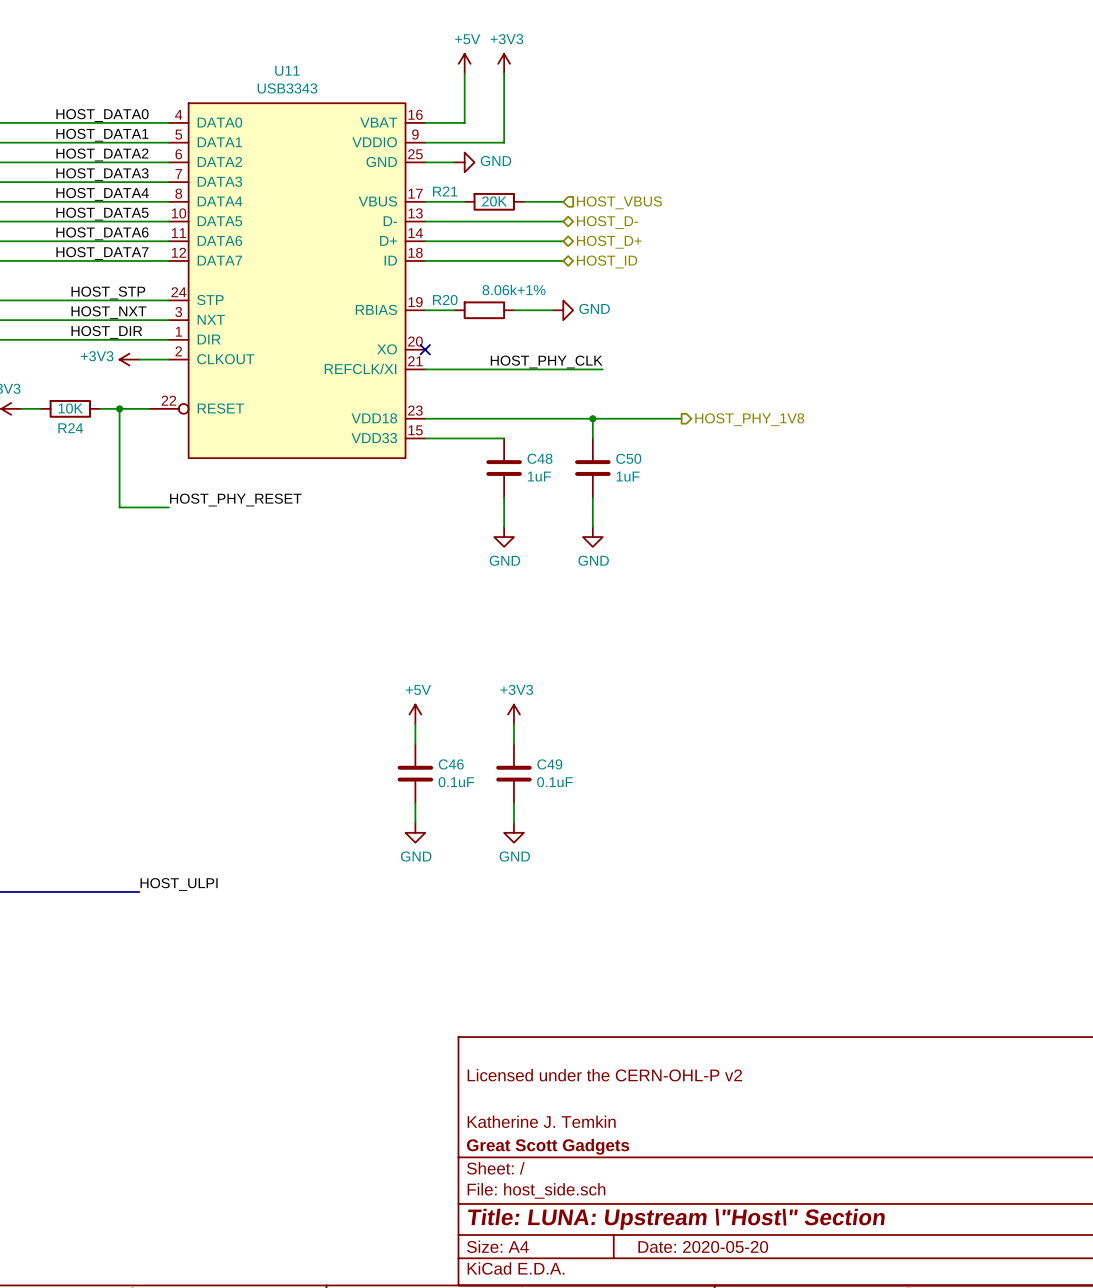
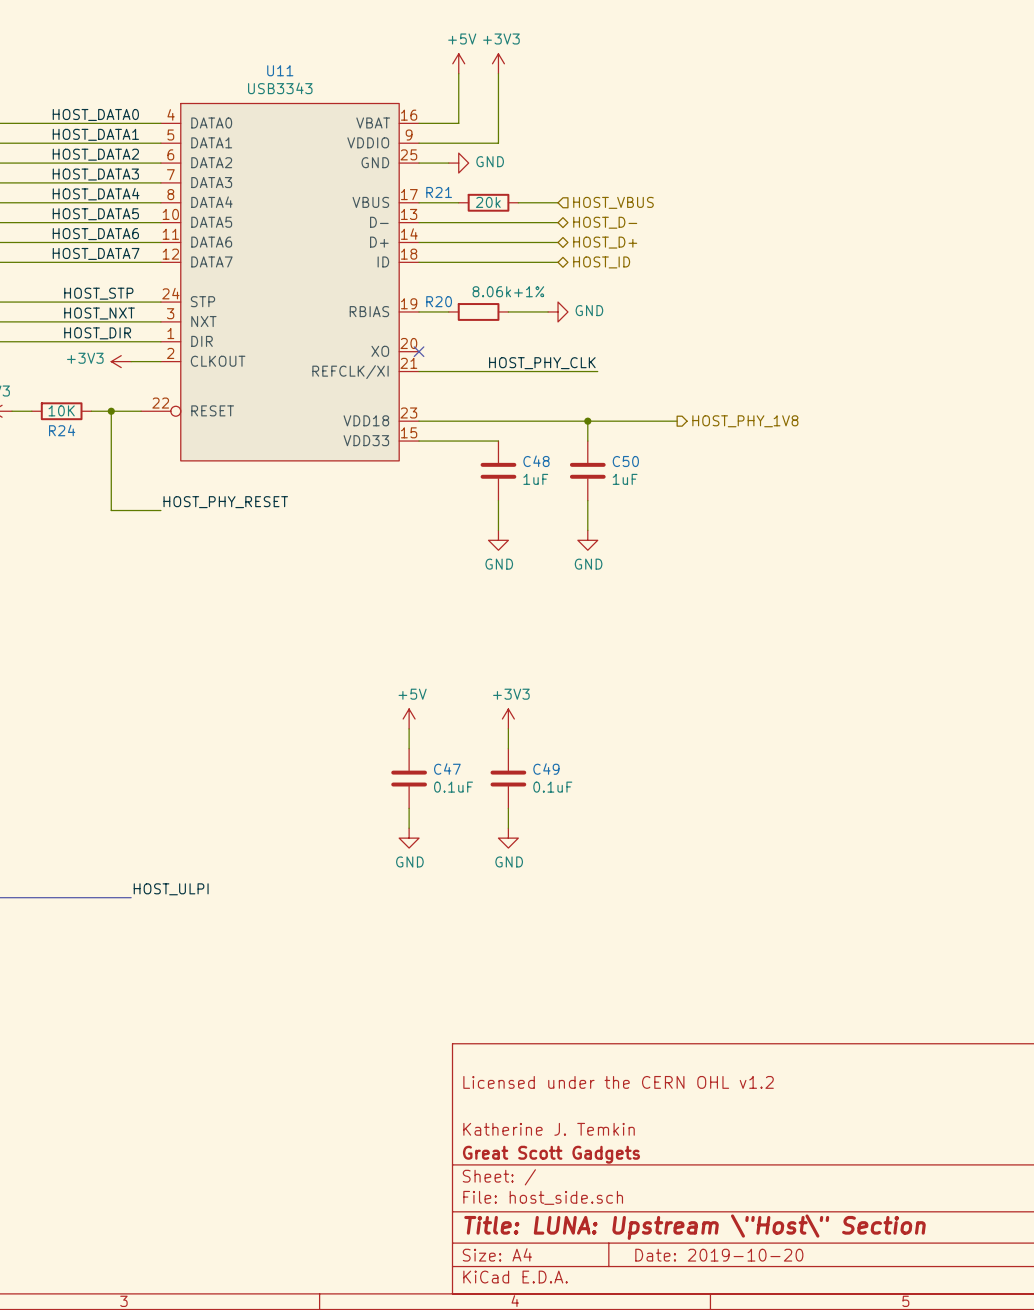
R21 value: 20K (494, 201) -> 20k (488, 202)
C46 name: C46 (451, 764) -> C47 (447, 769)
title block: Licensed under the CERN-OHL-P v2 (604, 1075) -> Licensed under the CERN OHL v1.2 (618, 1082)
title block: Date: 2020-05-20 (703, 1246) -> Date: 2019-10-20 (719, 1255)

